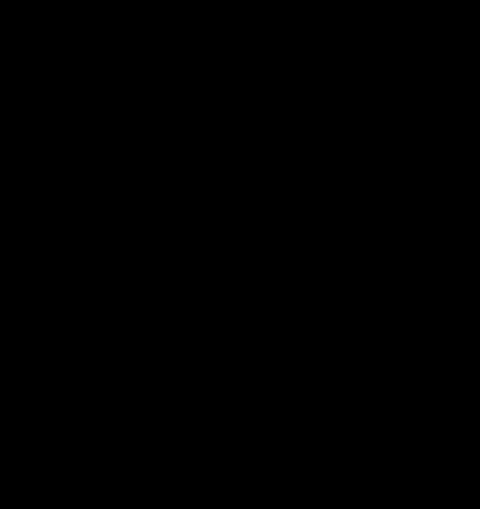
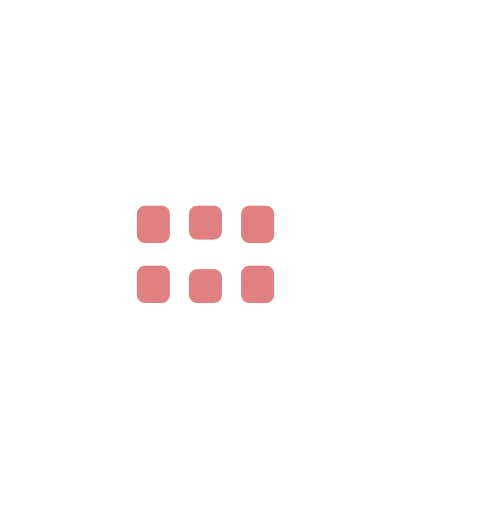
part: none -> (153, 254)
part: none -> (205, 254)
part: none -> (257, 254)

